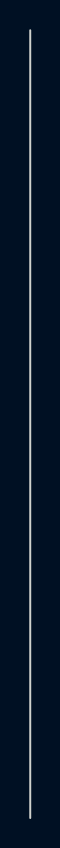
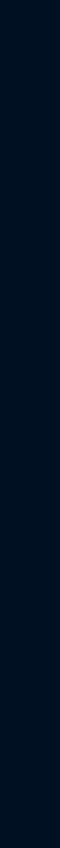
board edge: (30, 30) (30, 818) -> none

